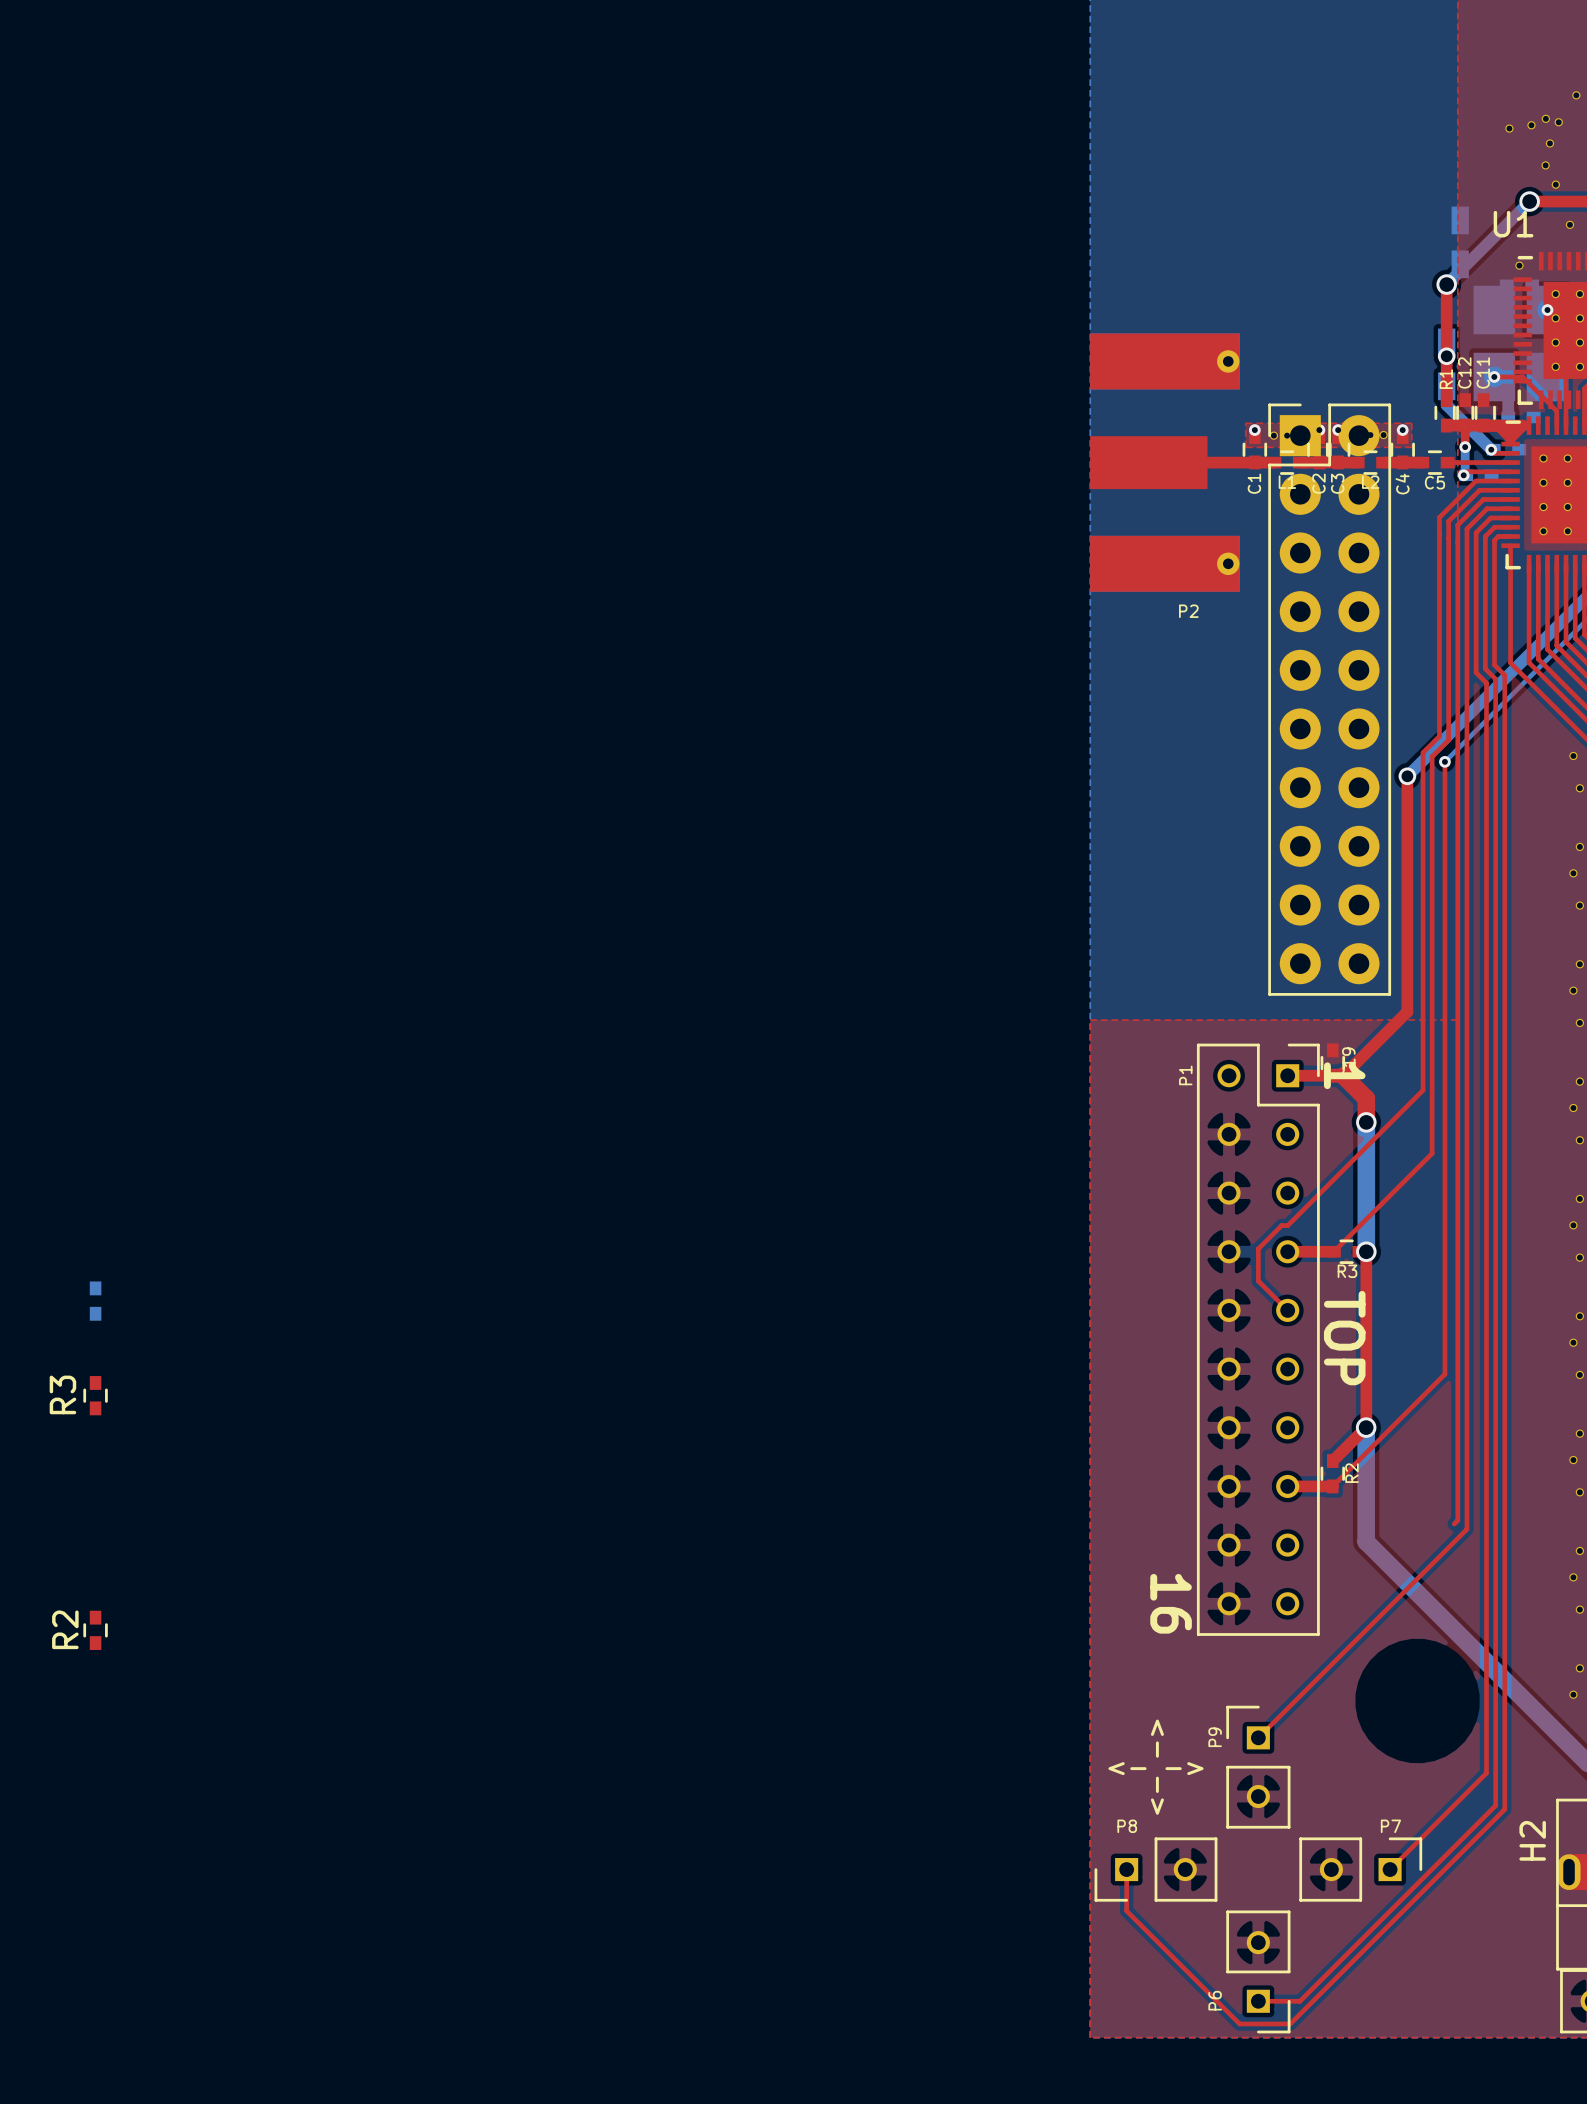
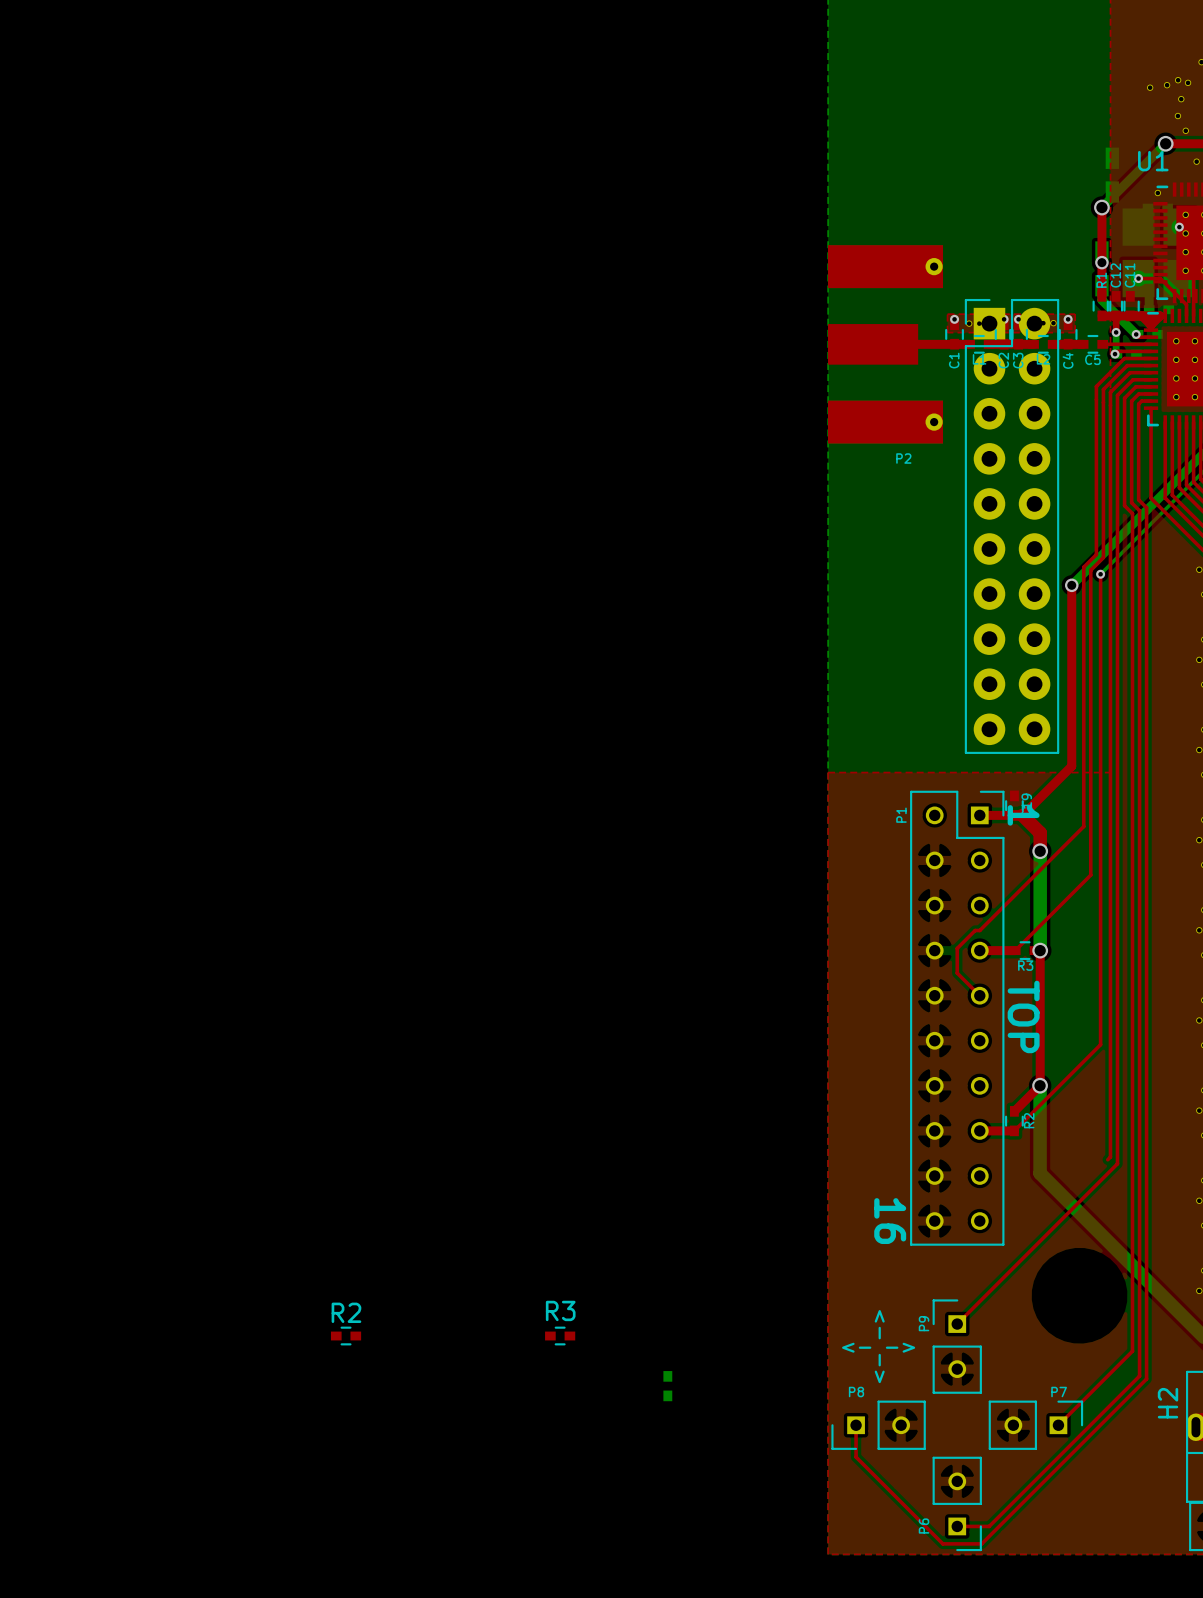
part: (95, 1301) -> none
R3: (95, 1395) -> none
R2 rotation: 0° (95, 1630) -> 90° clockwise (346, 1336)
R2 position: (95, 1630) -> (346, 1336)
R3: none -> (560, 1336)
part: none -> (667, 1386)

